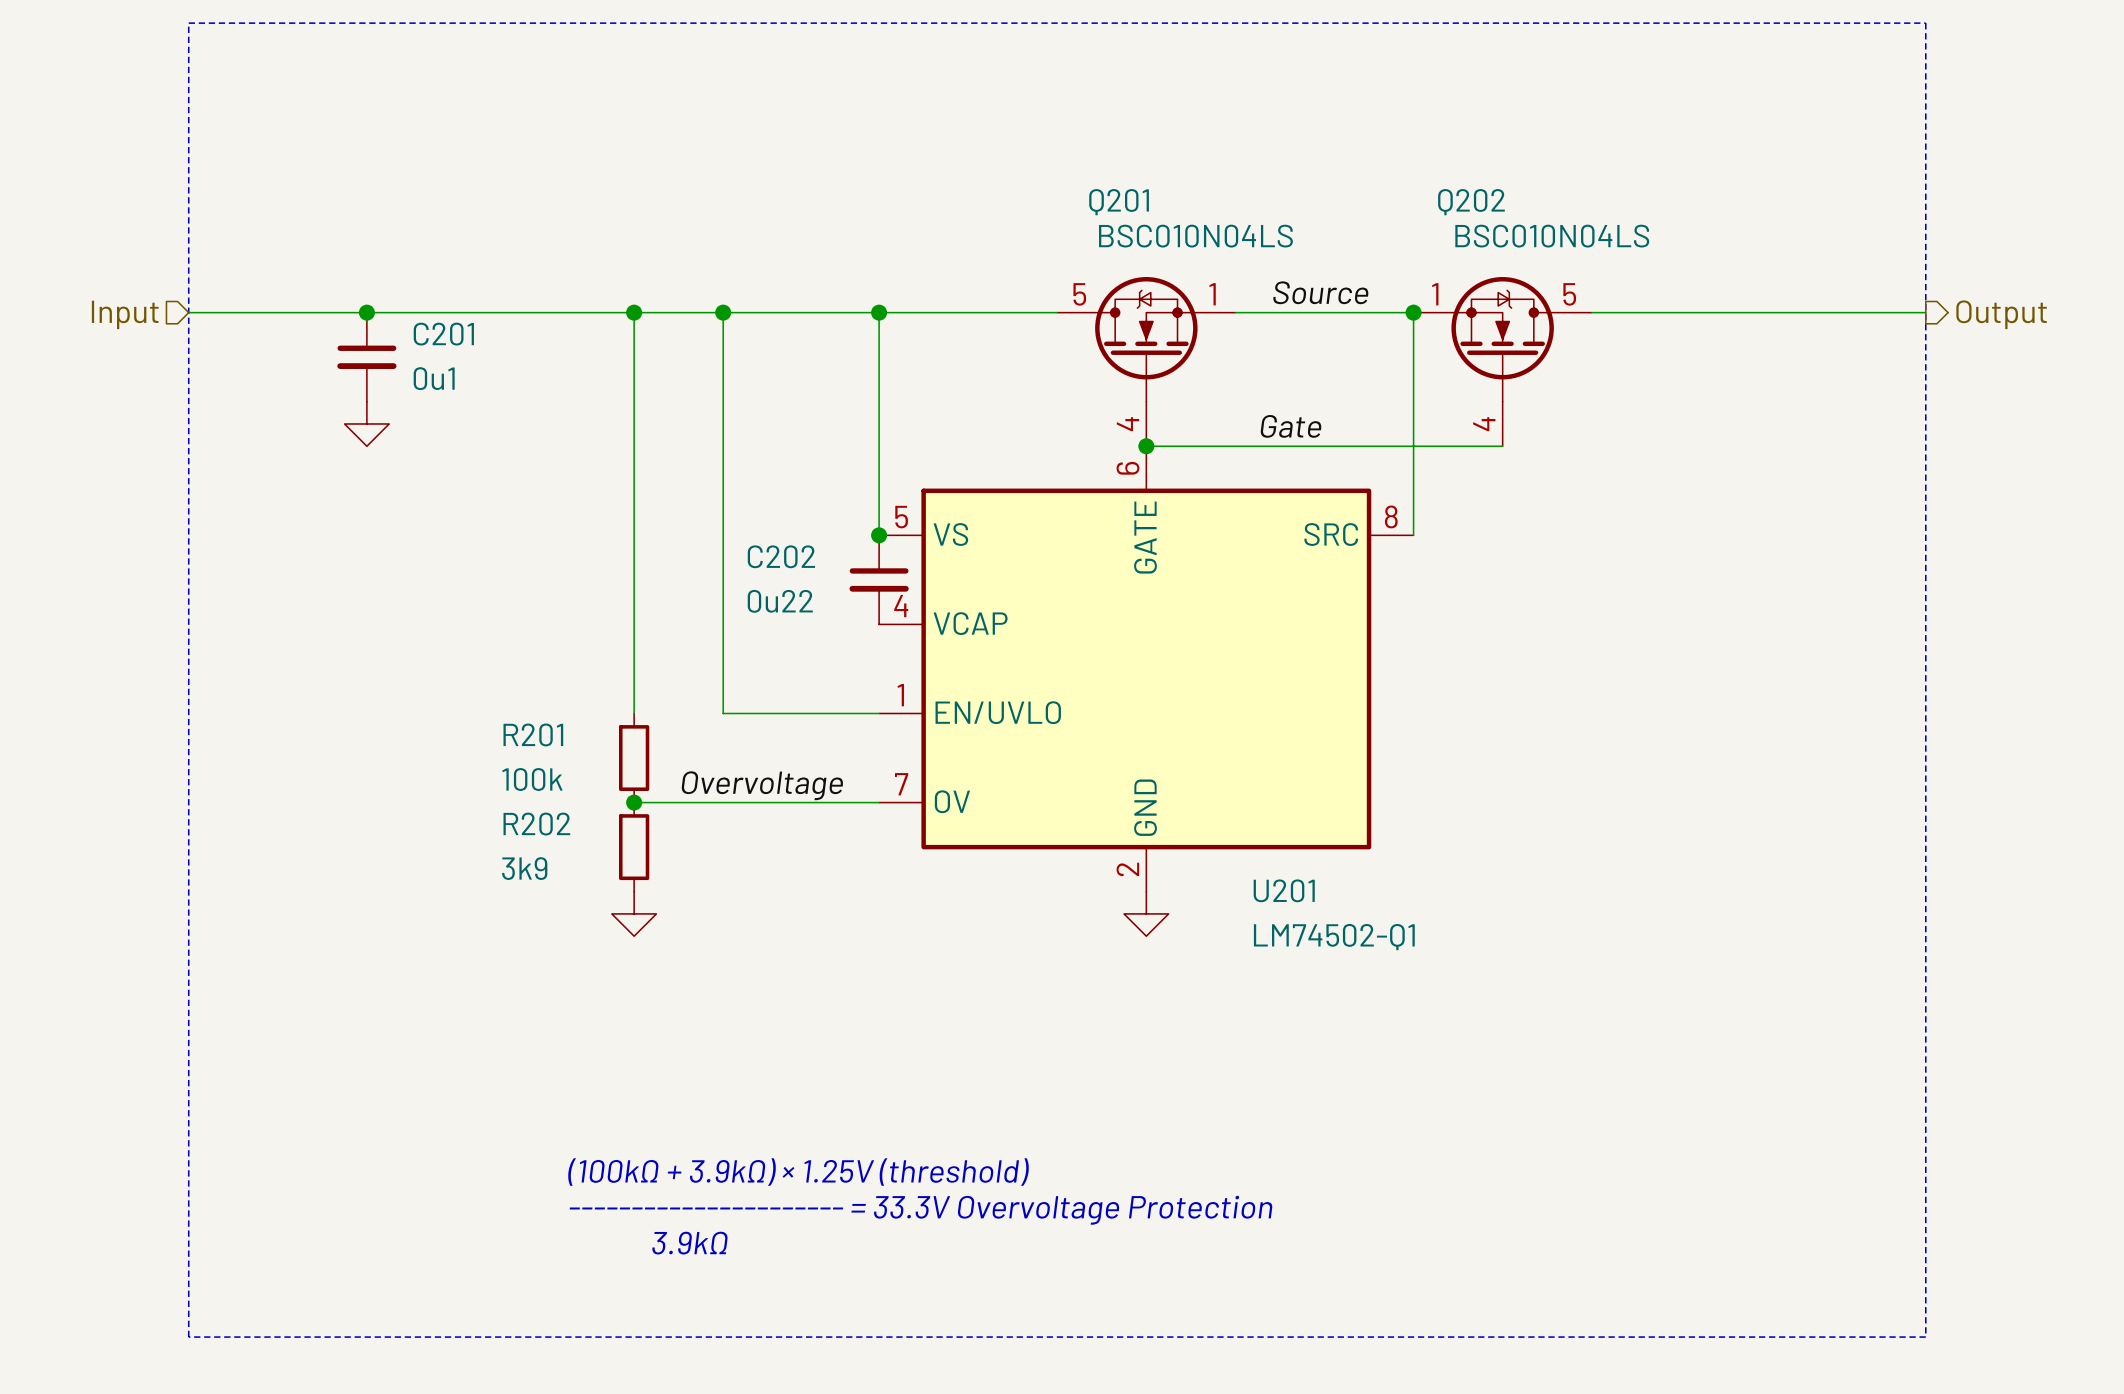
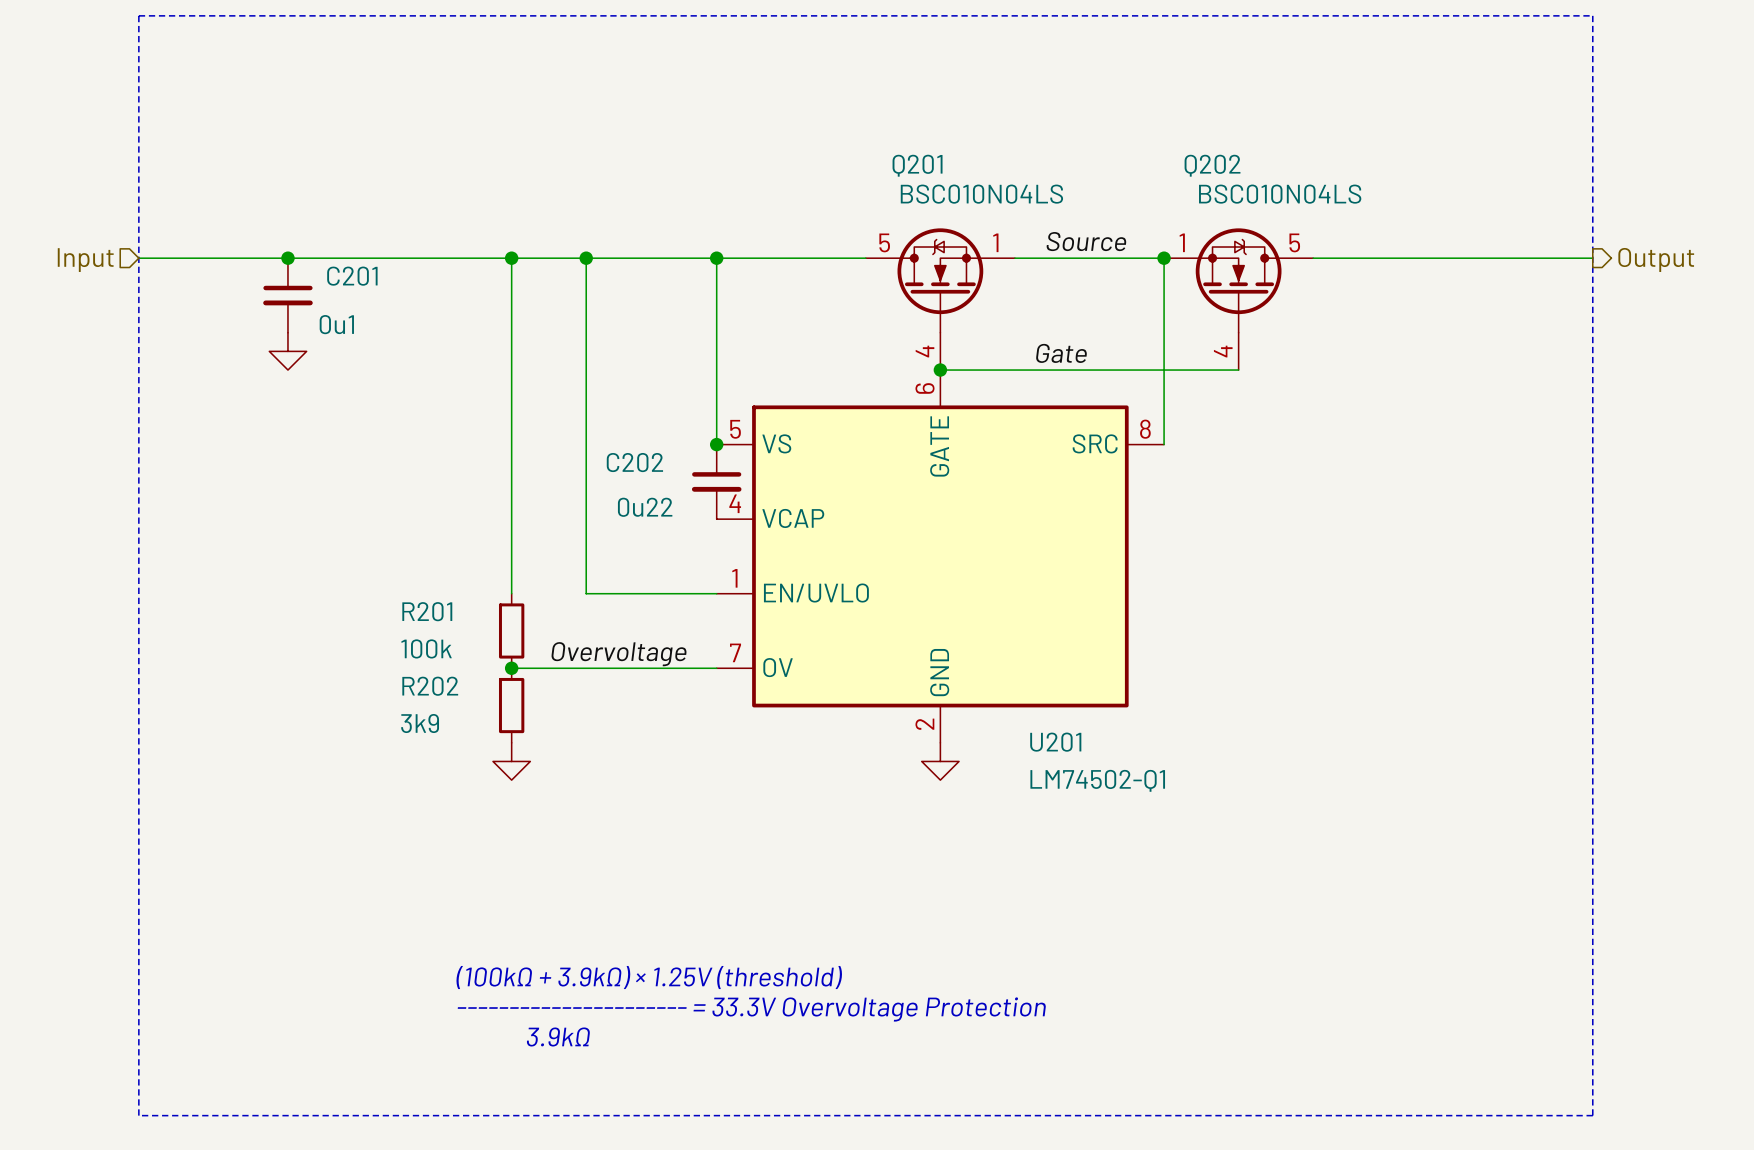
C201 value position: 0u1 (434, 378) -> 0u1 (336, 324)
C202 value position: 0u22 (780, 601) -> 0u22 (645, 507)

